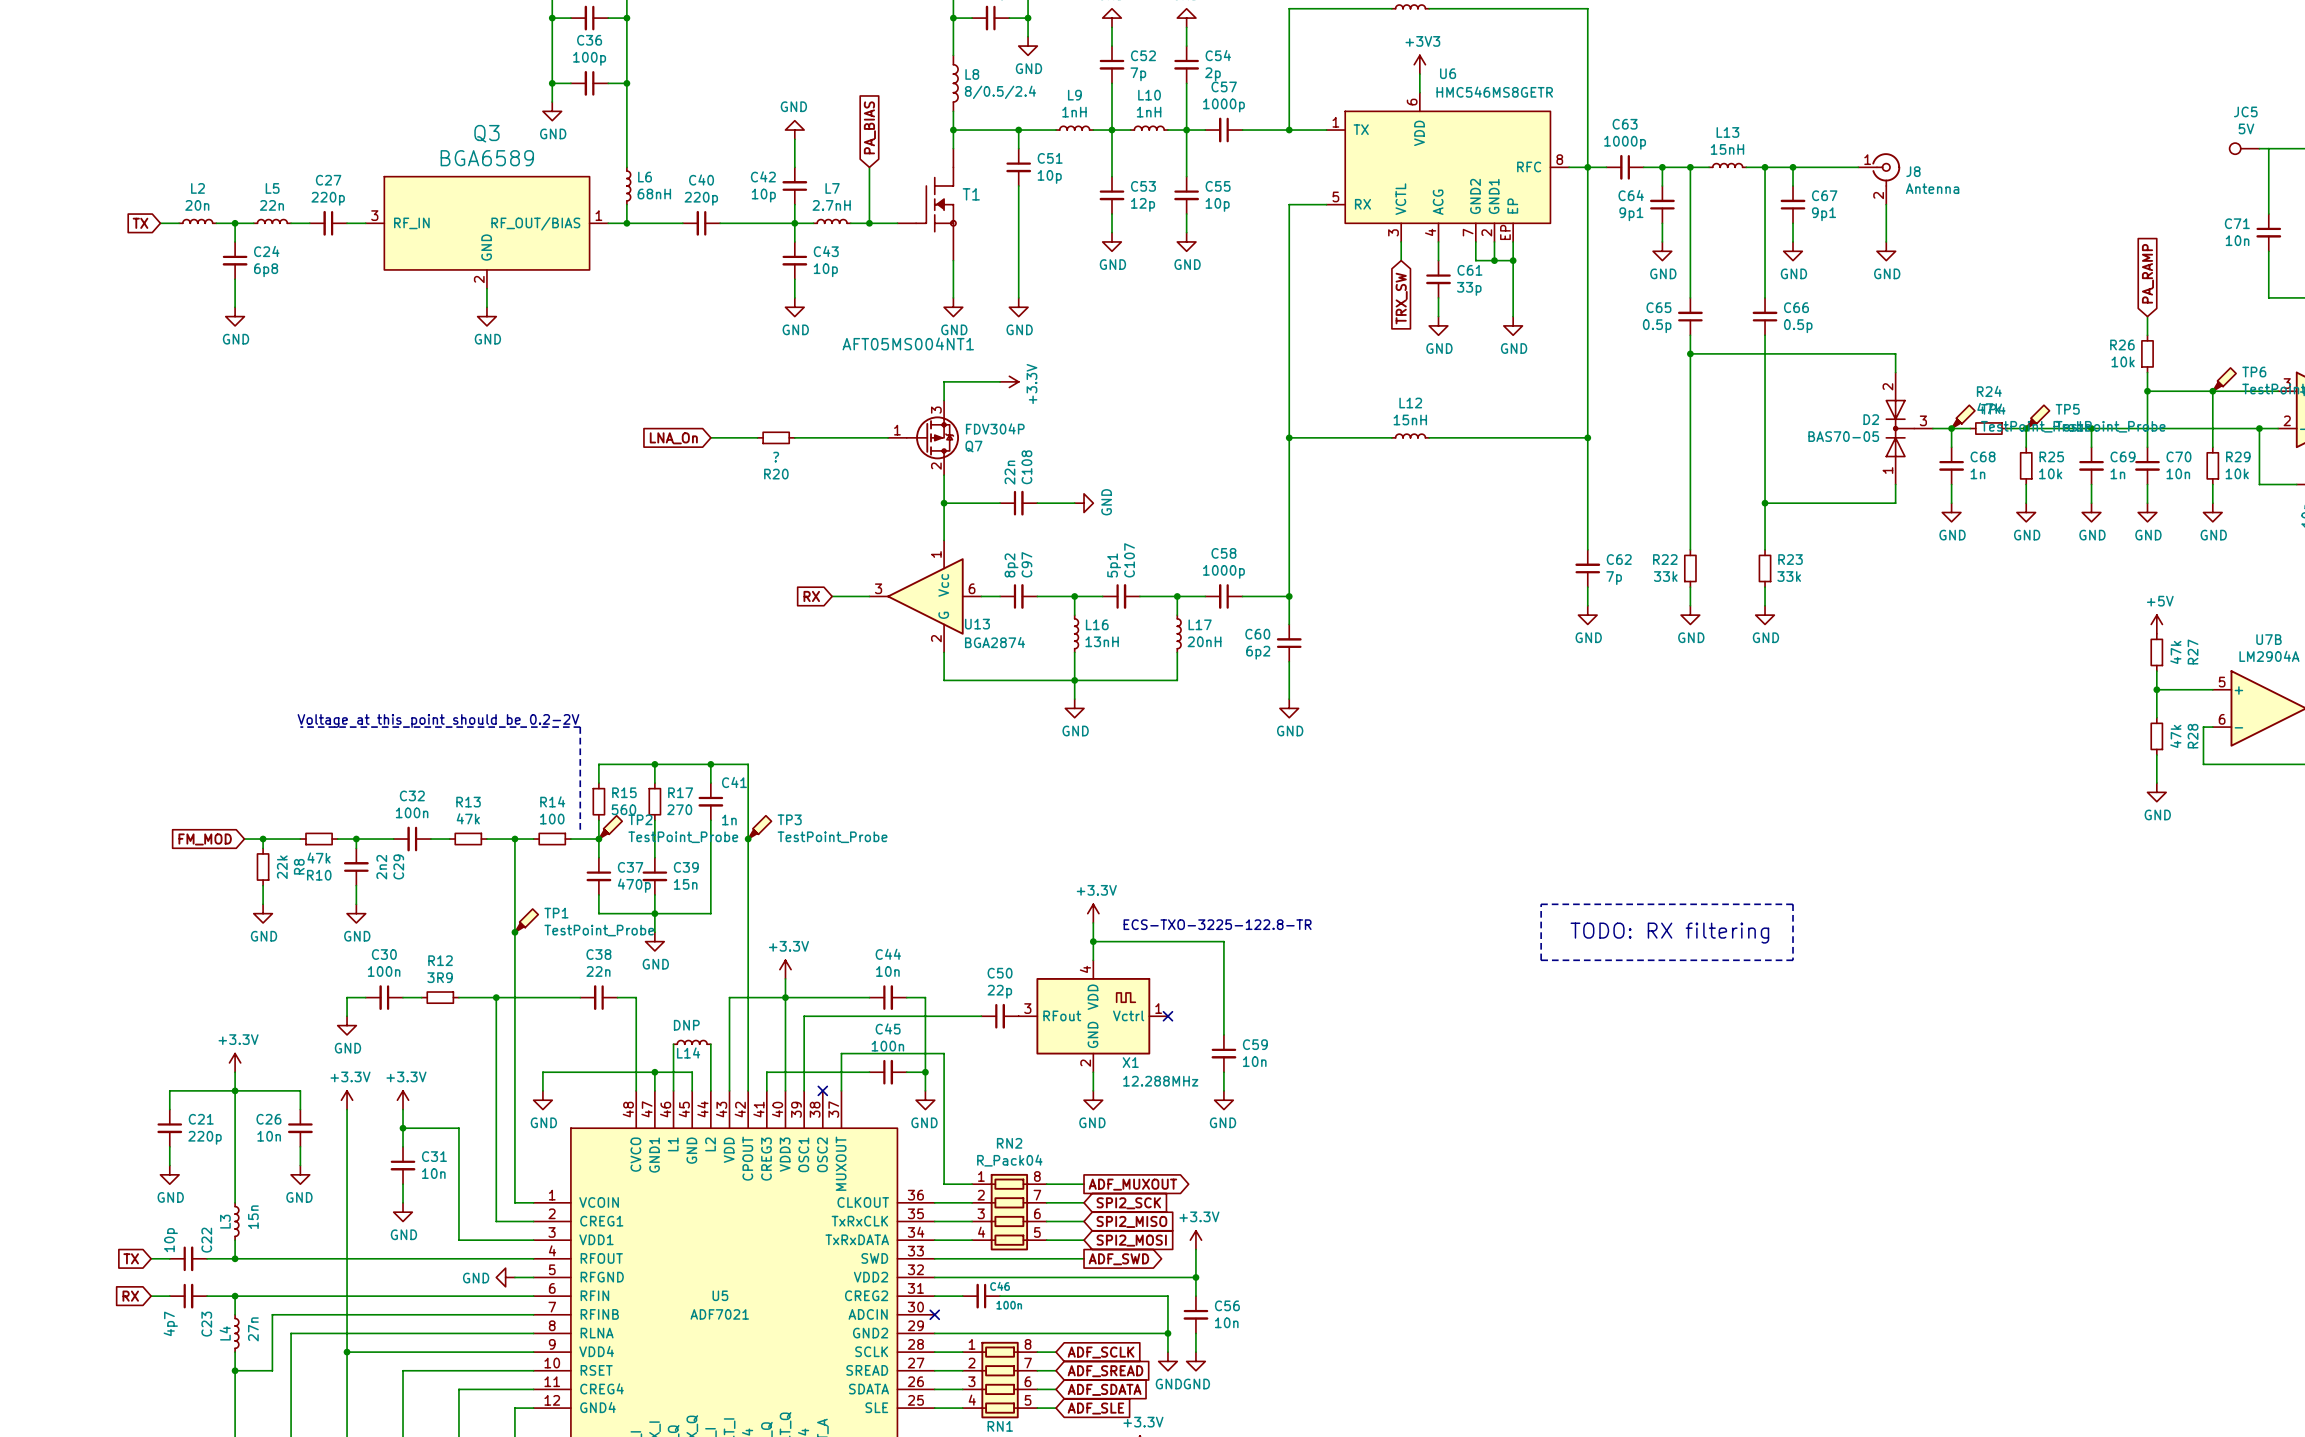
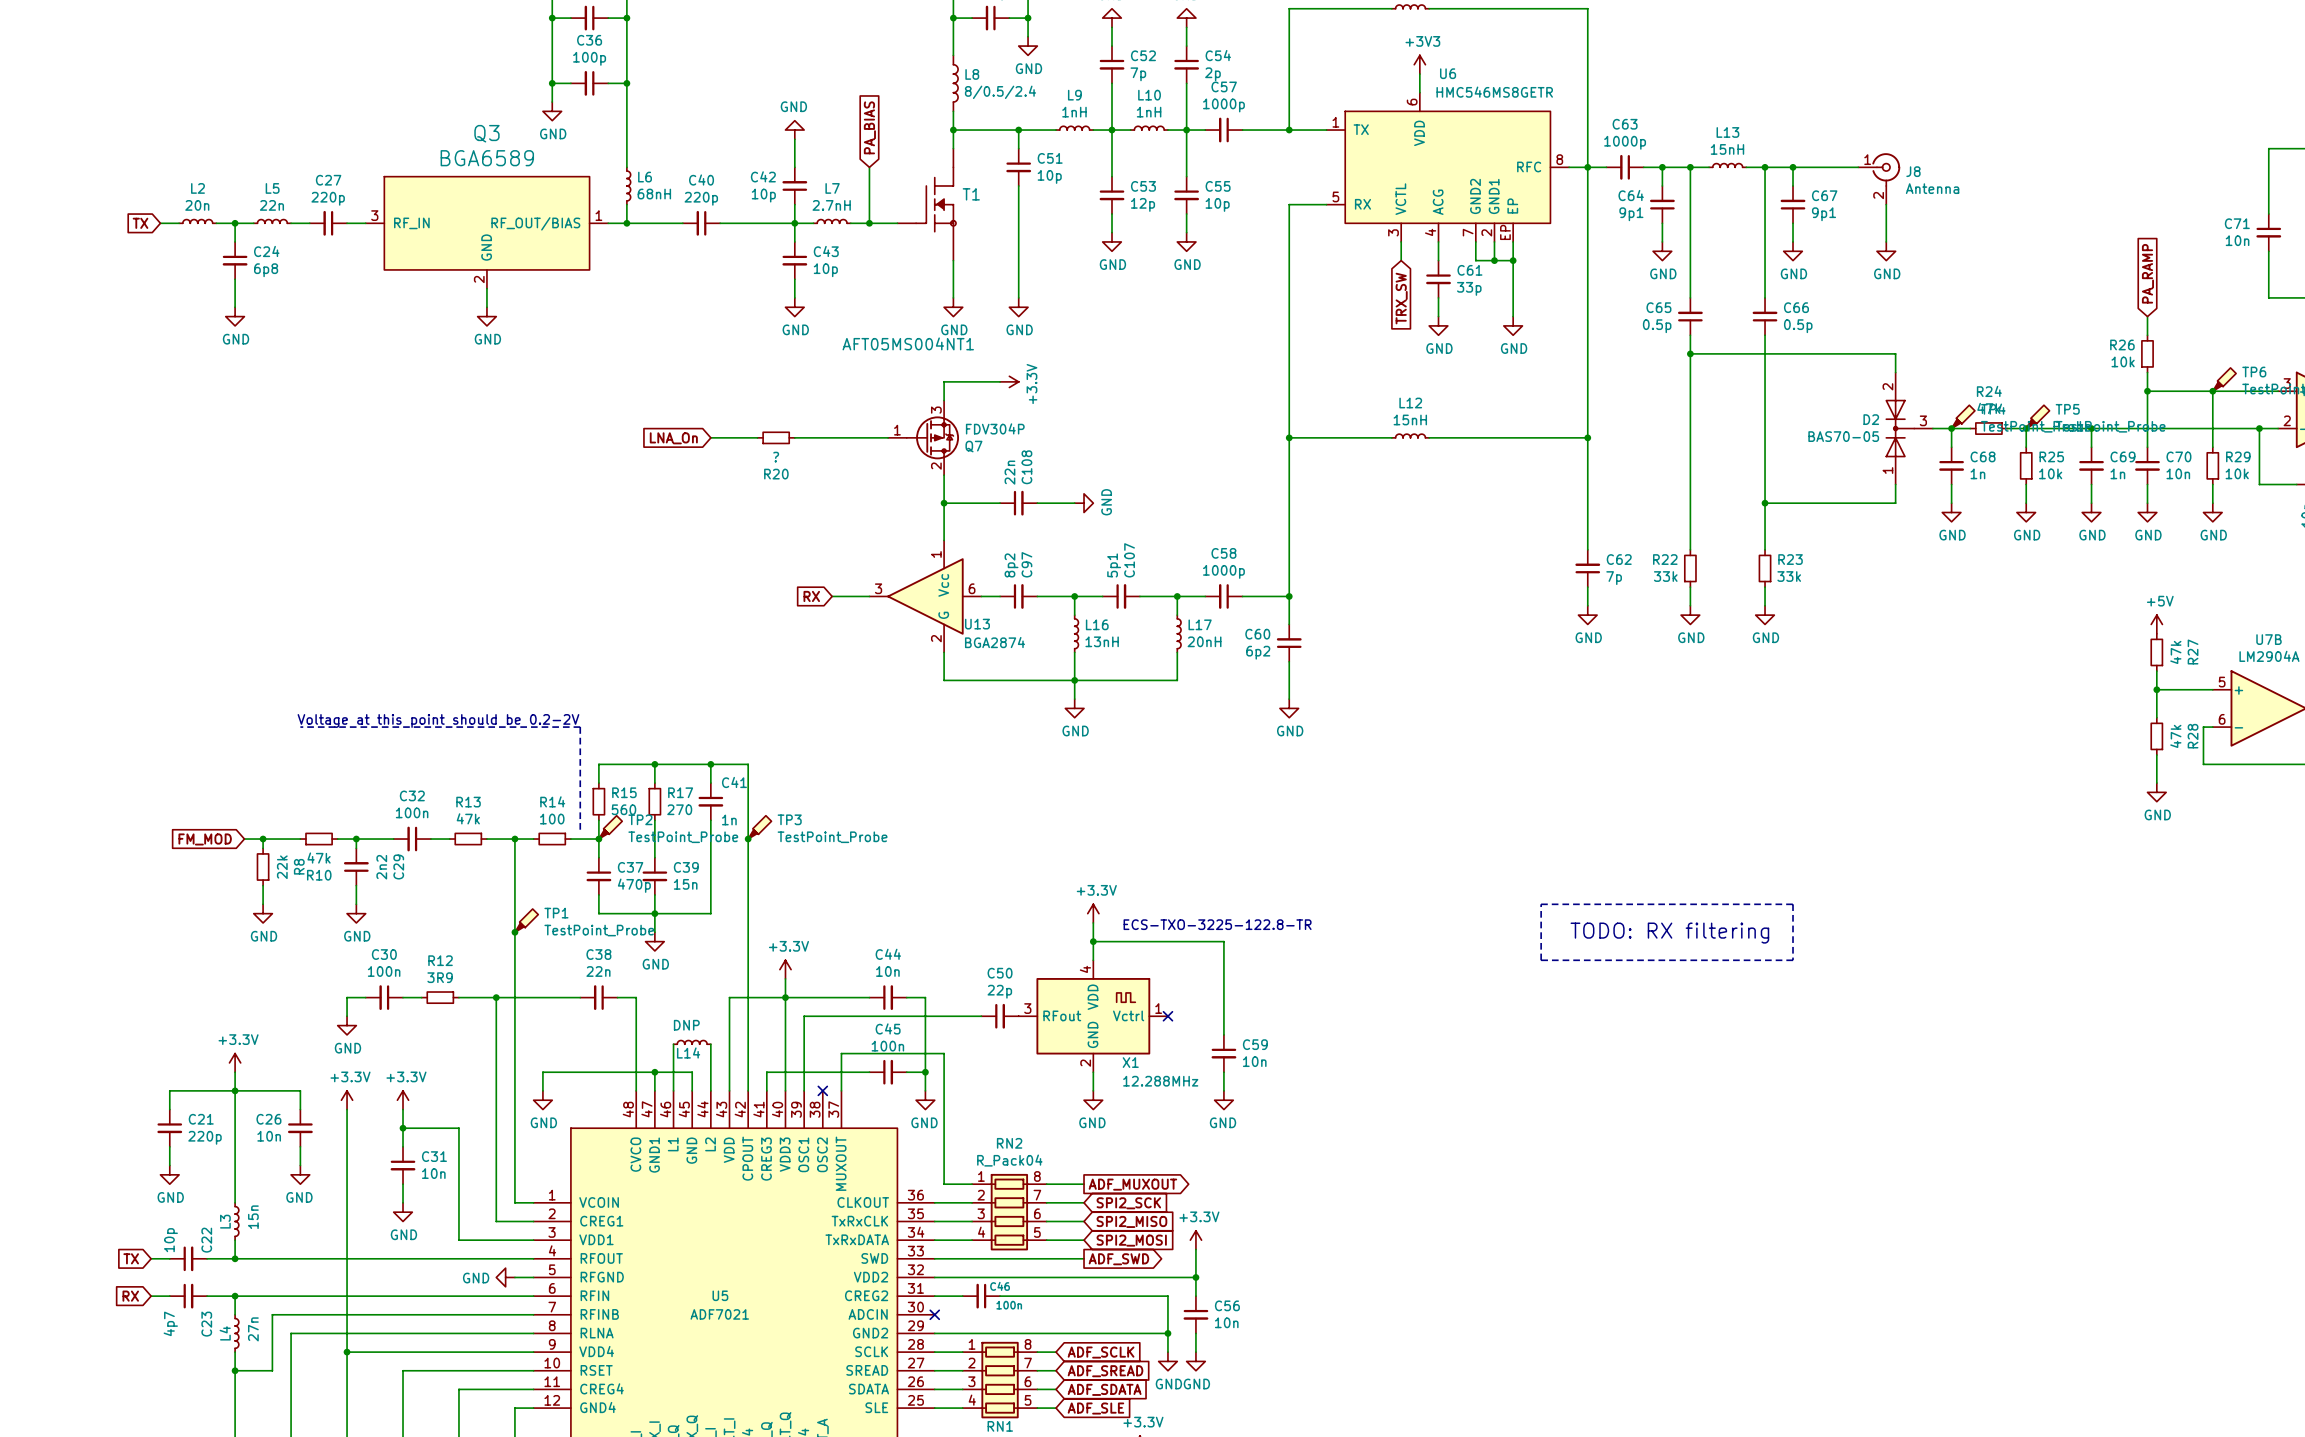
JC5: 5V (2244, 148) -> none
wire: (2259, 148) (2268, 148) -> none

